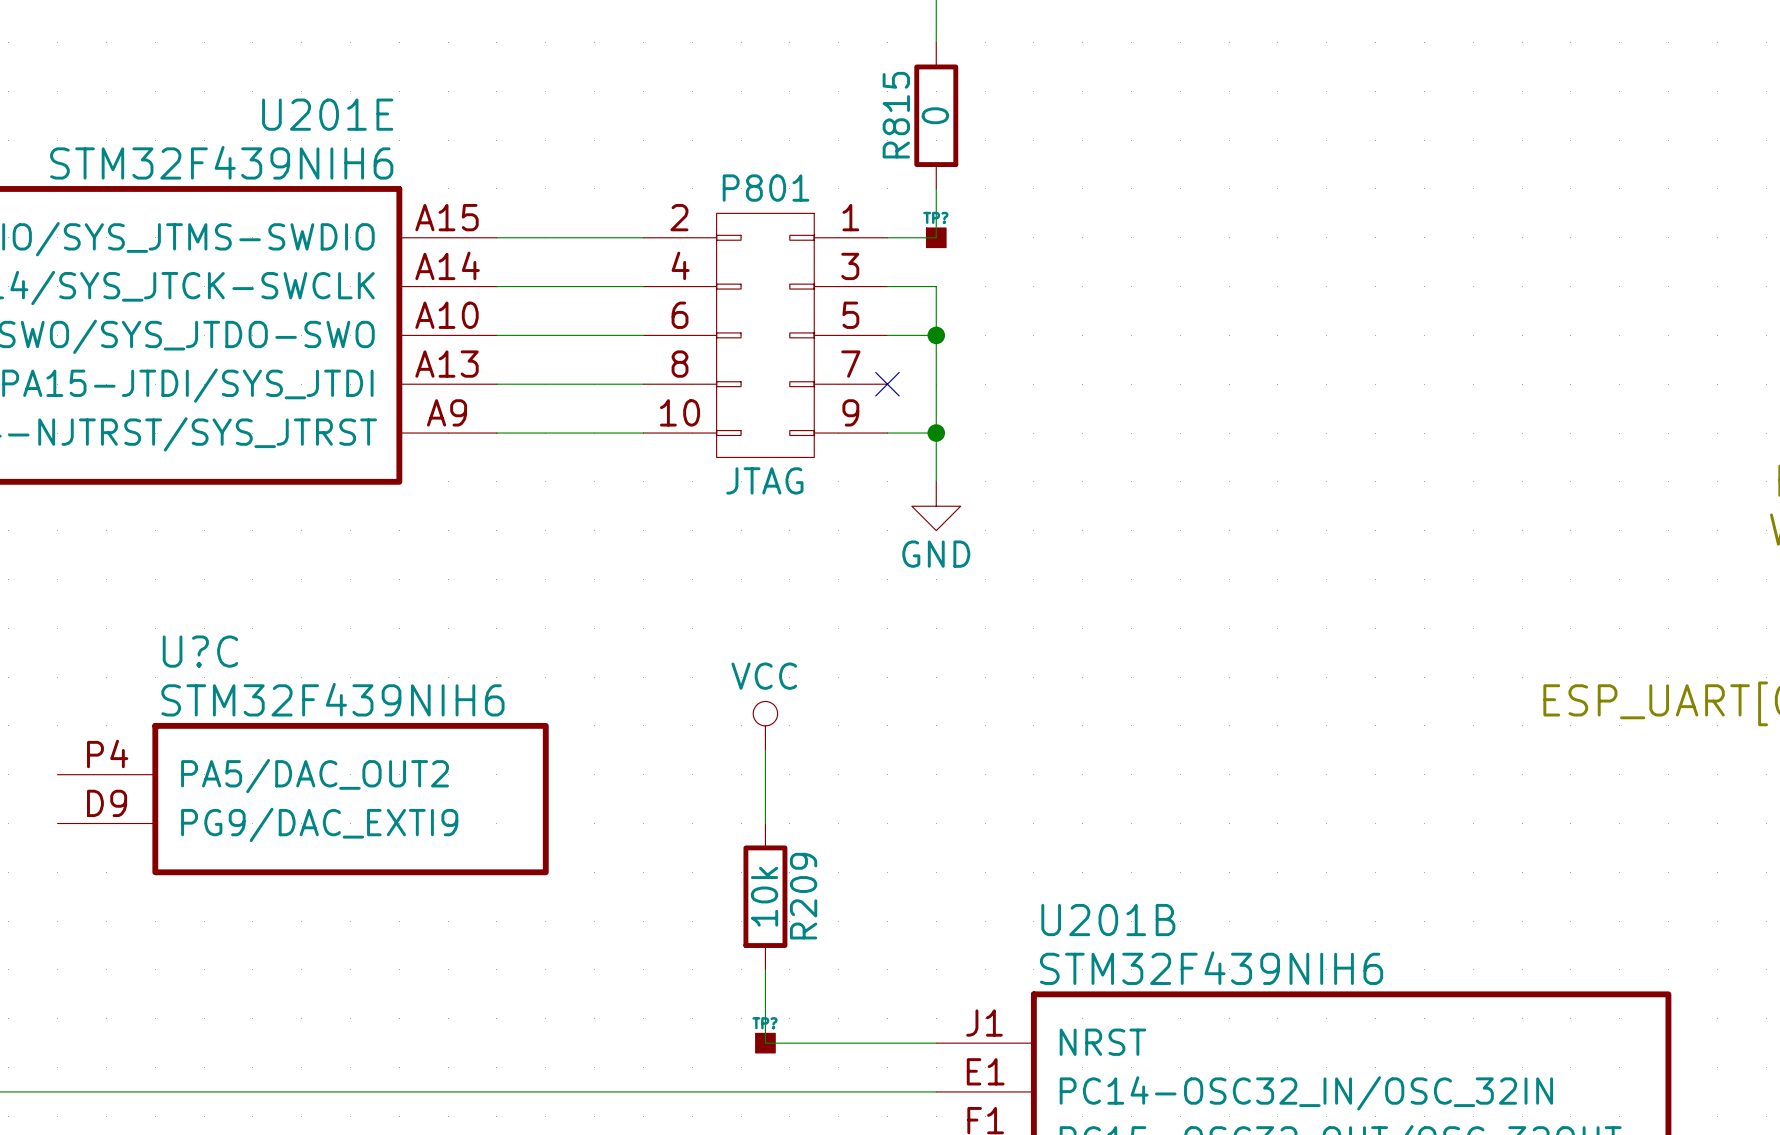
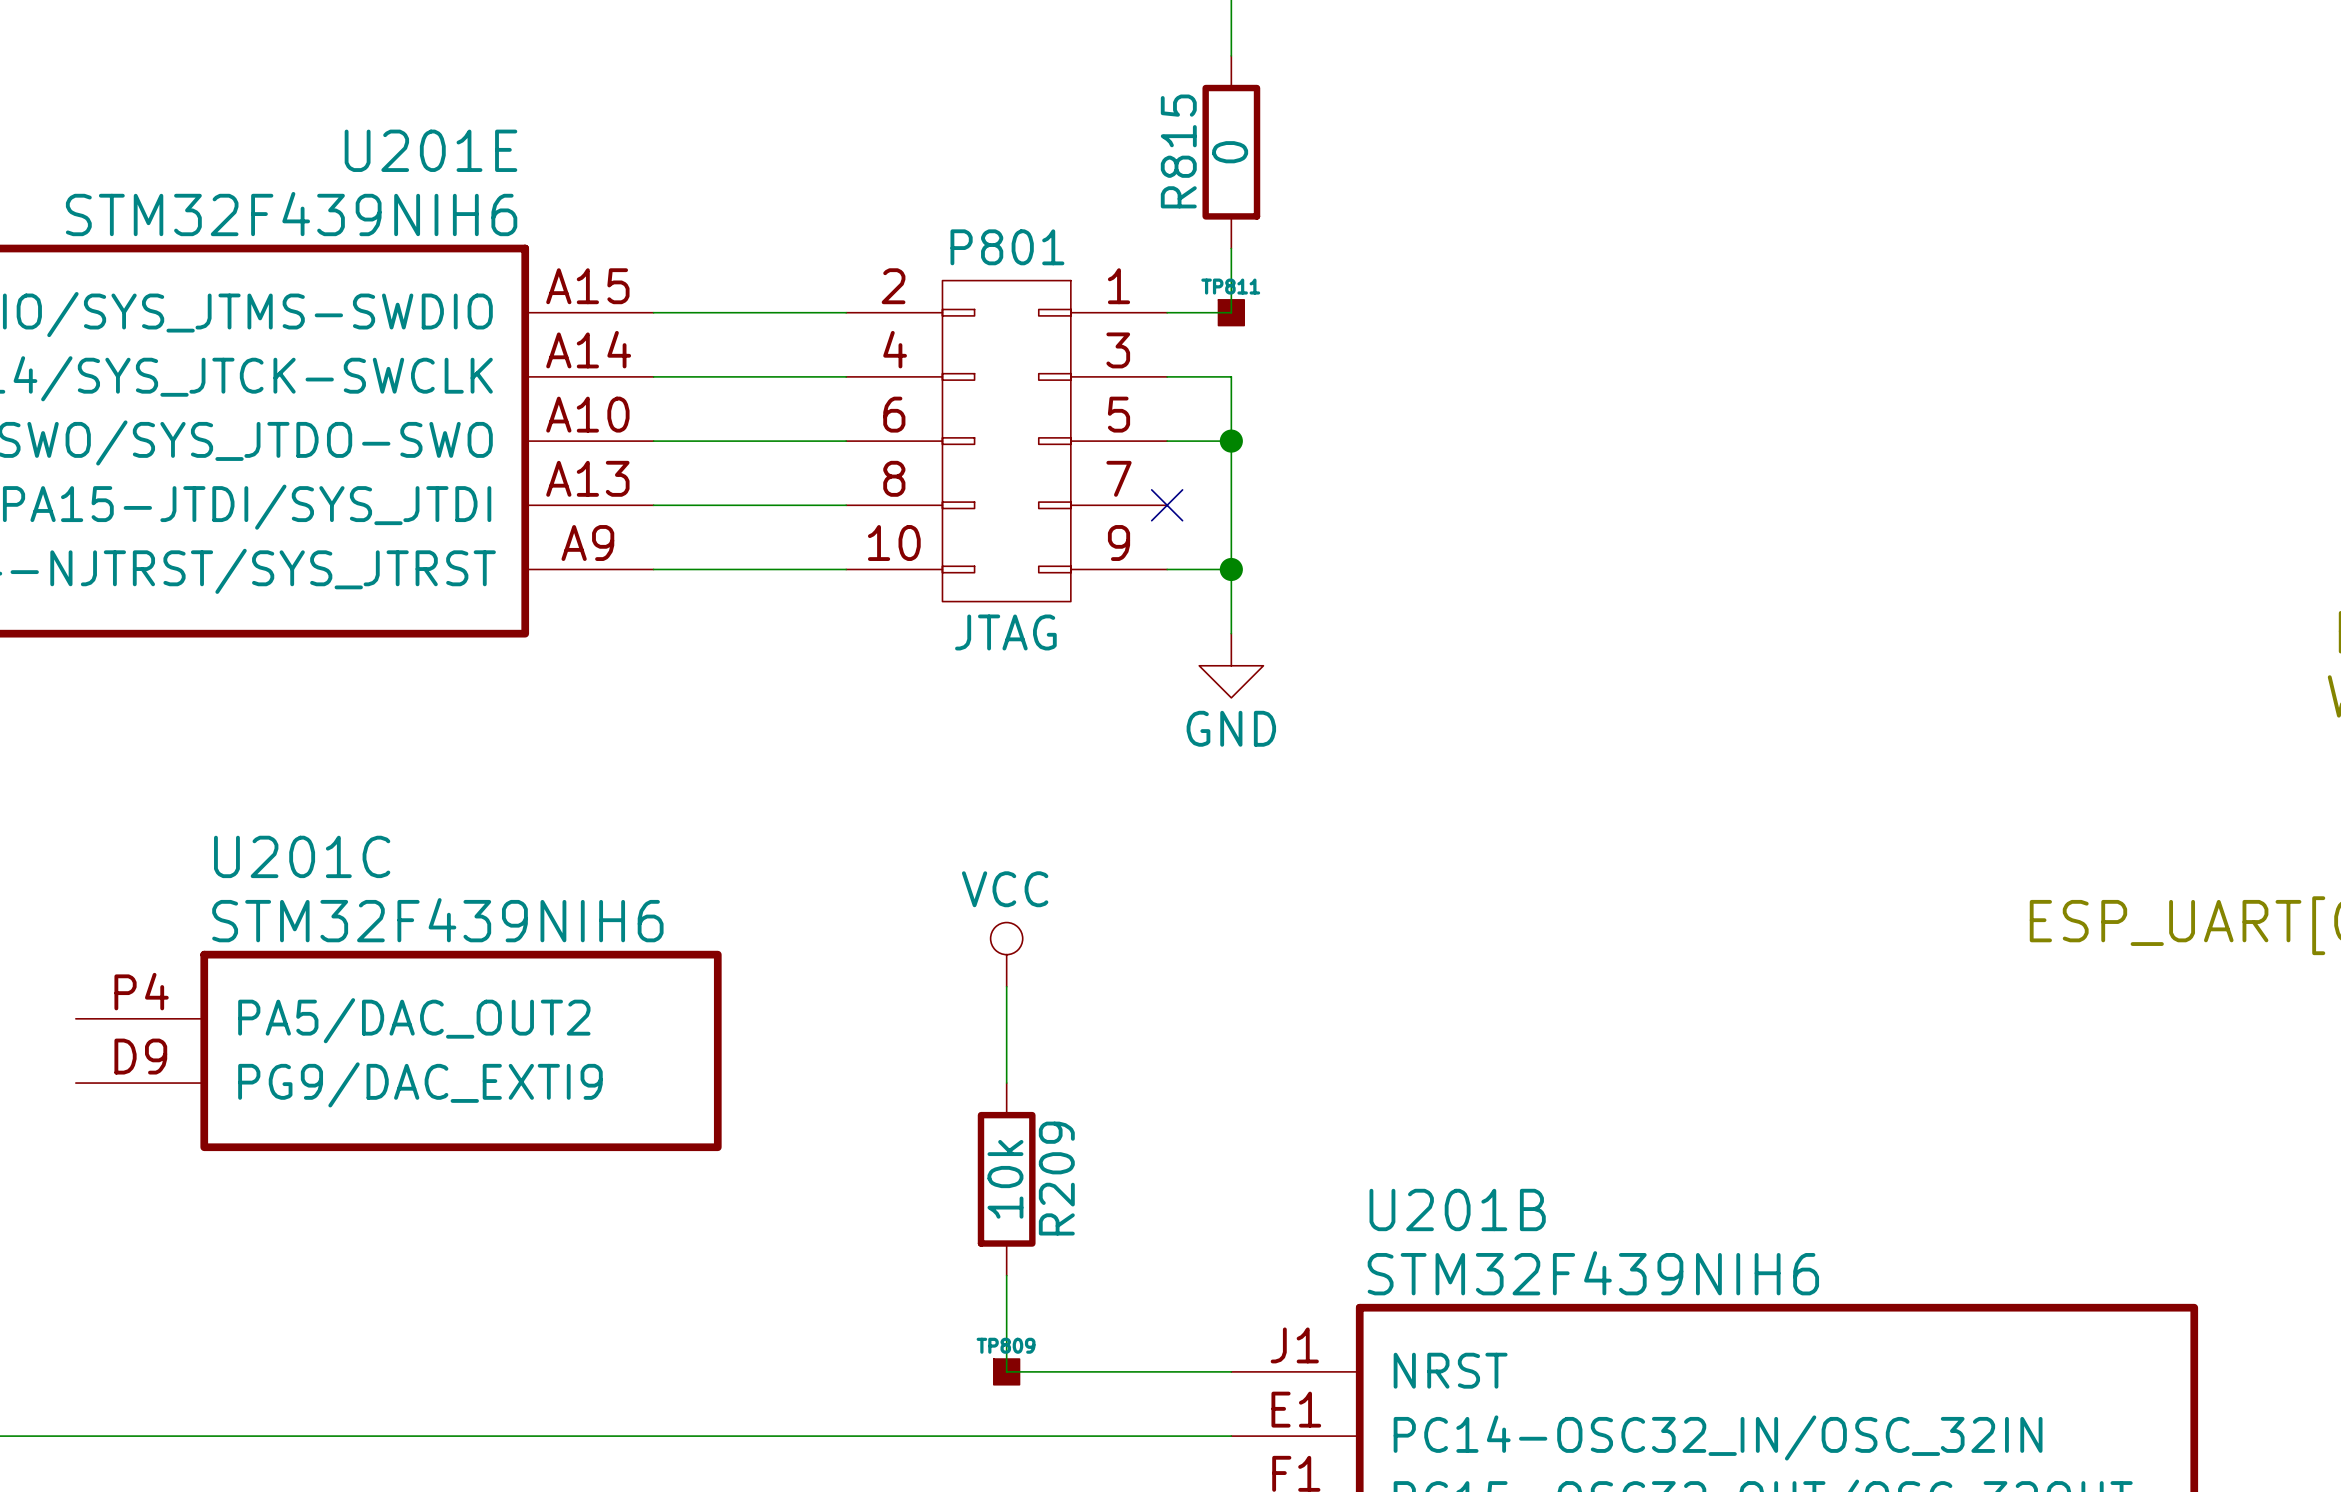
TP? name: TP? (935, 217) -> TP811 (1230, 286)
U?C name: U?C (200, 651) -> U201C (302, 856)
TP? name: TP? (764, 1023) -> TP809 (1006, 1345)

